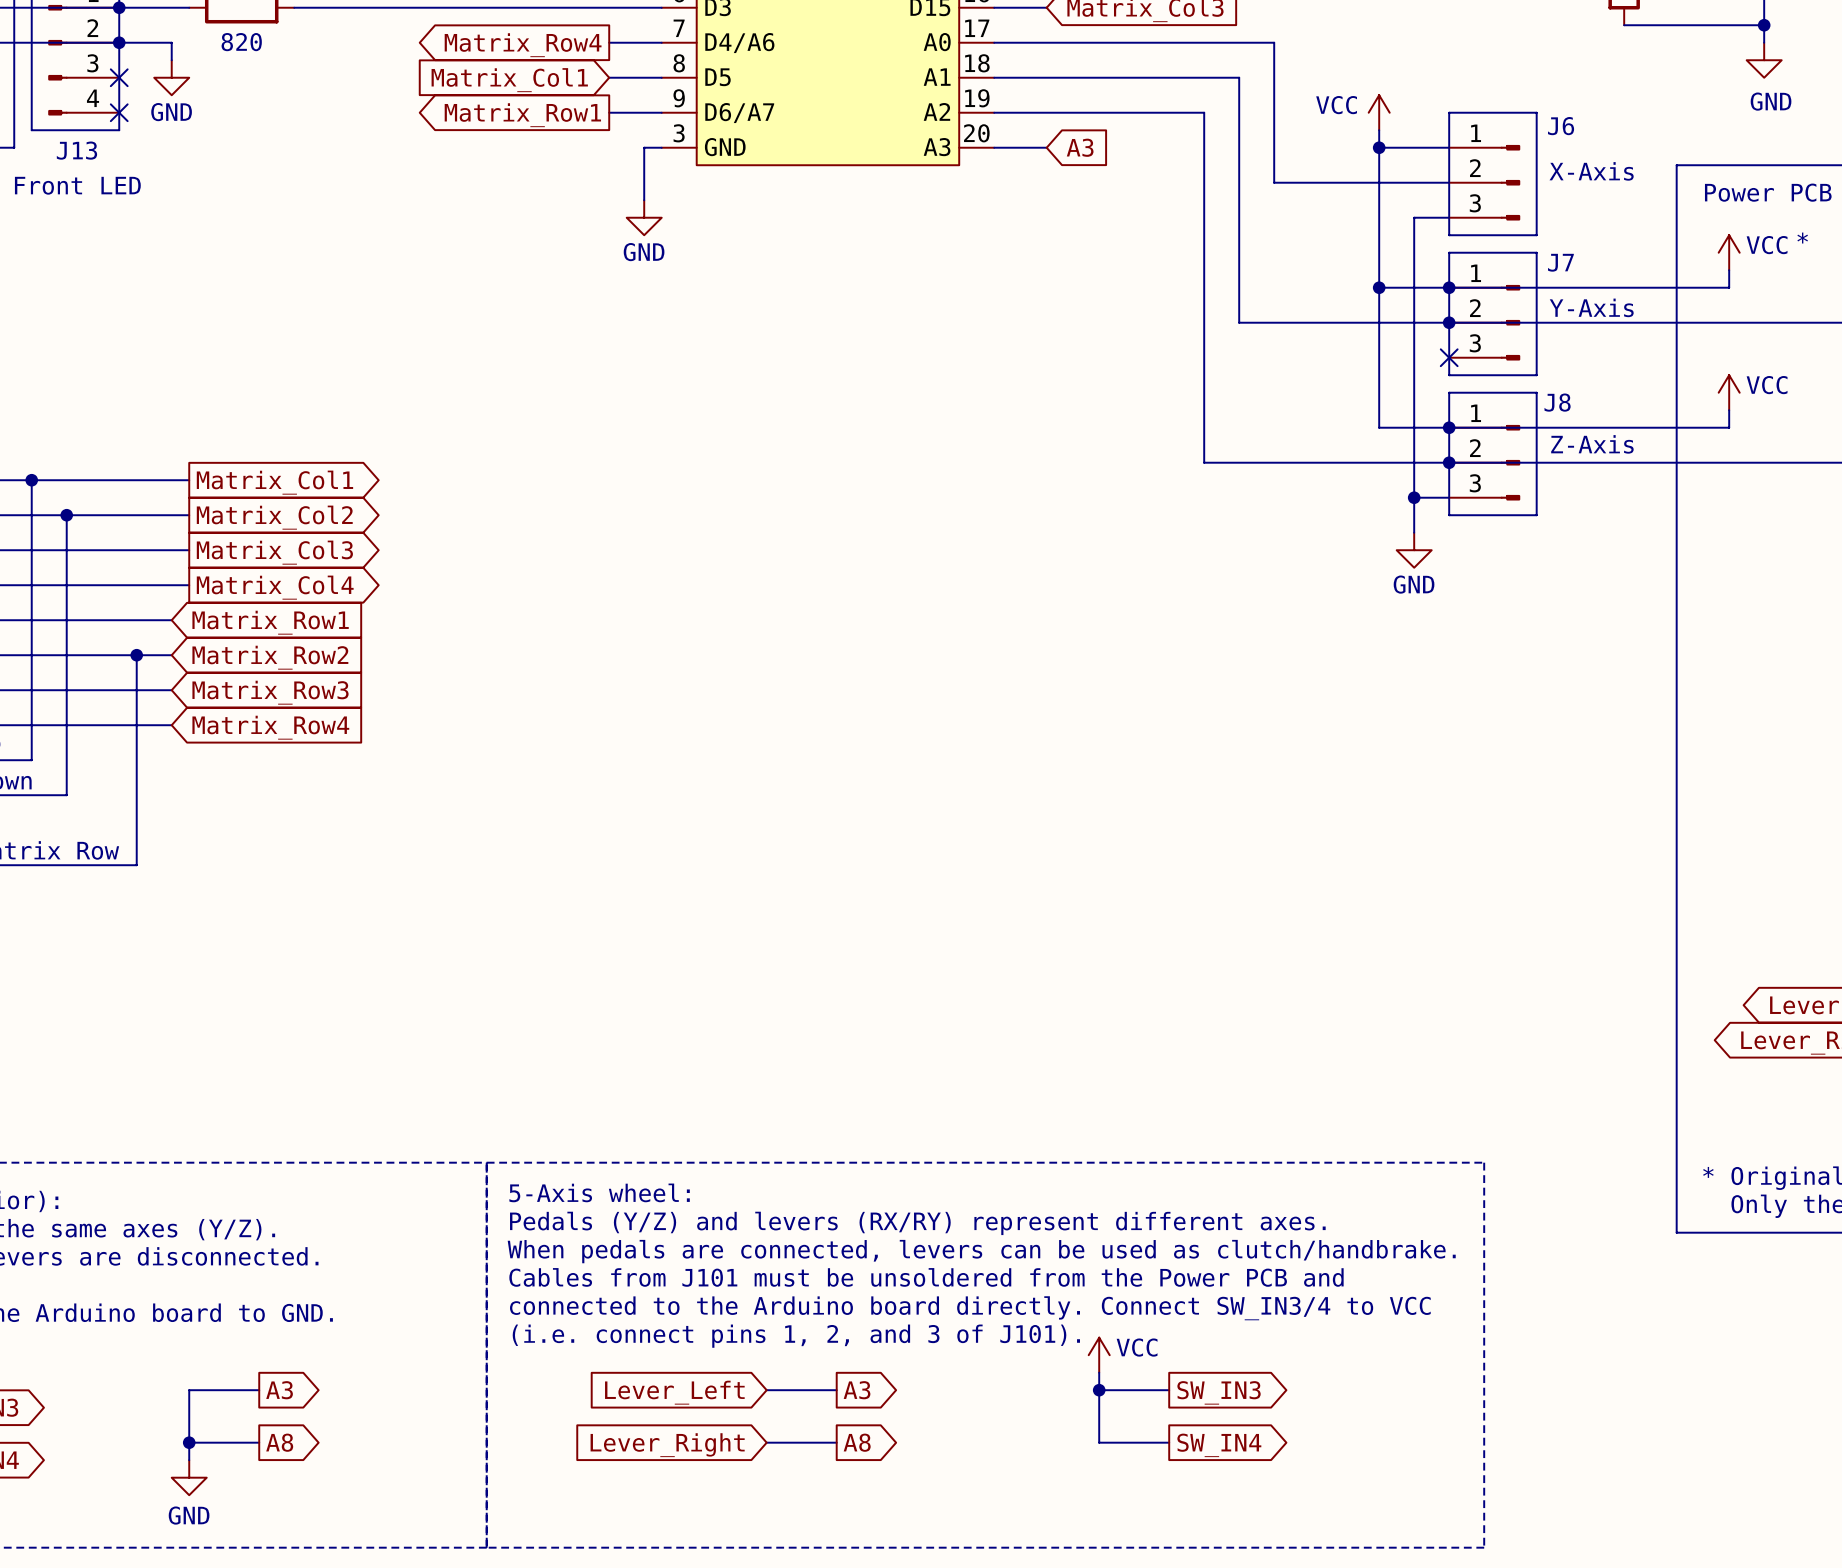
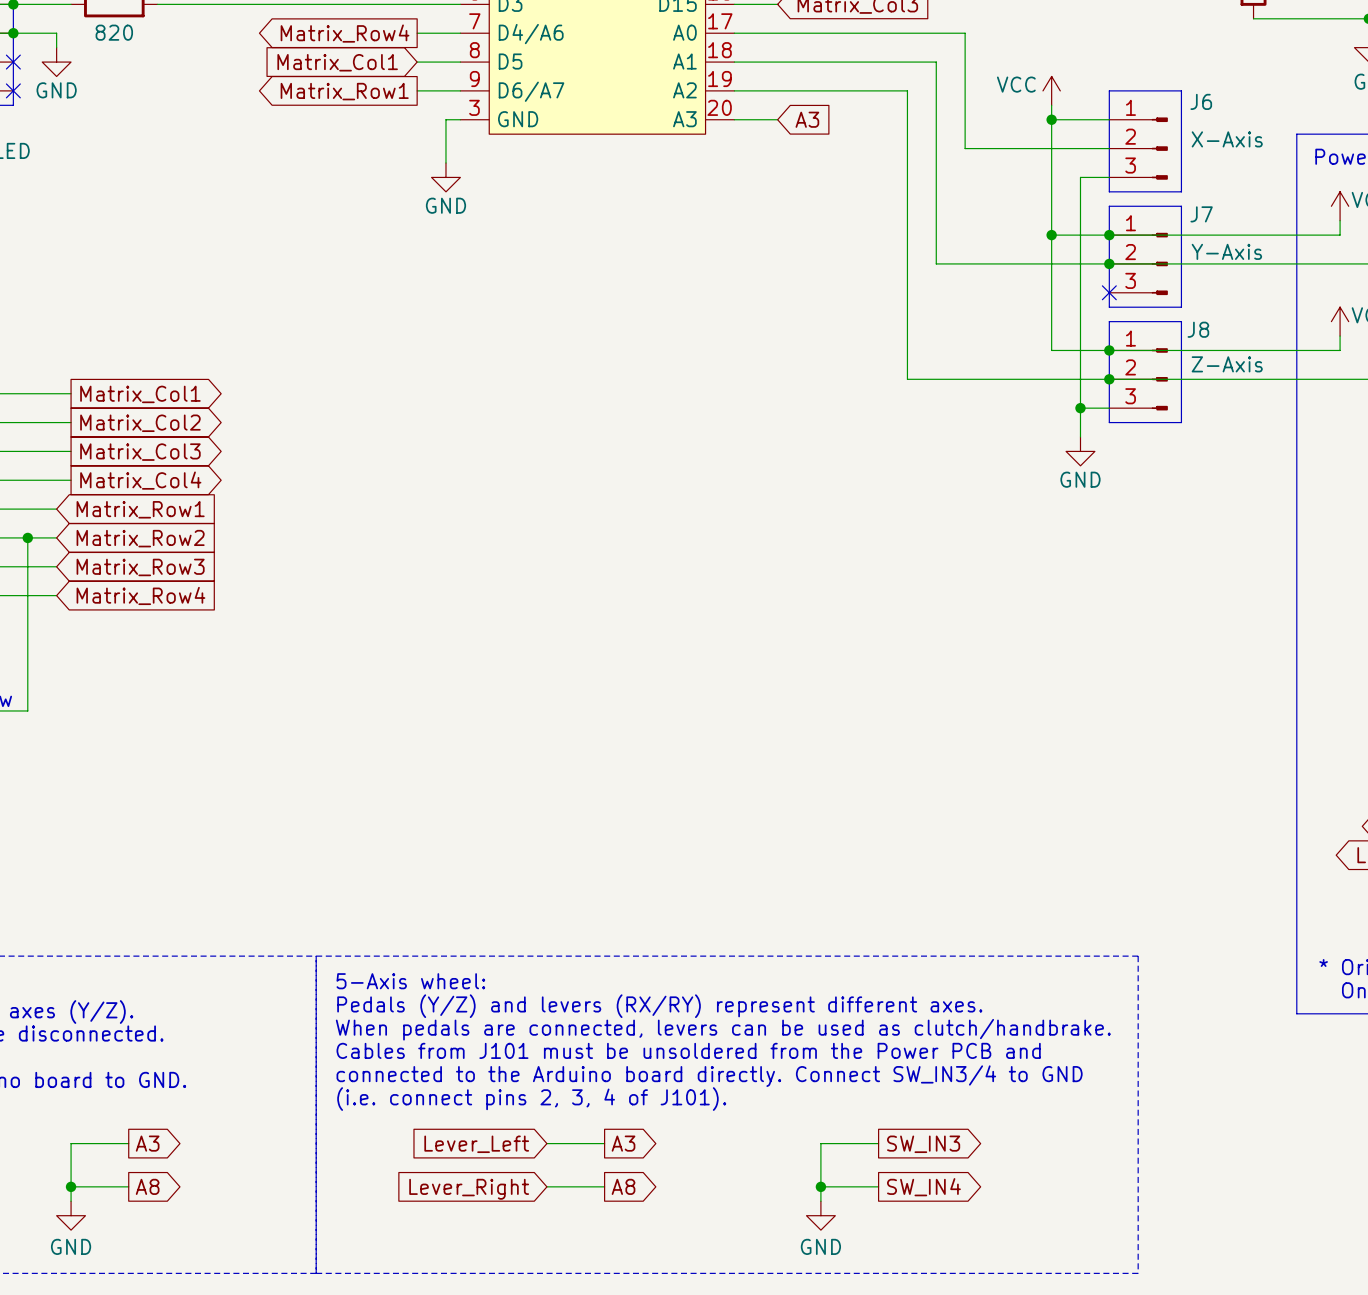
text: connected to the Arduino board directly. Connect SW_IN3/4 to VCC (970, 1308) -> connected to the Arduino board directly. Connect SW_IN3/4 to GND (709, 1076)
text: (i.e. connect pins 1, 2, and 3 of J101). (796, 1336) -> (i.e. connect pins 2, 3, 4 of J101). (531, 1099)
power symbol: VCC (1099, 1355) -> none
wire: (1099, 1372) (1099, 1390) -> (820, 1186) (820, 1201)
junction position: (1099, 1390) -> (820, 1186)
power symbol: none -> GND (820, 1215)

